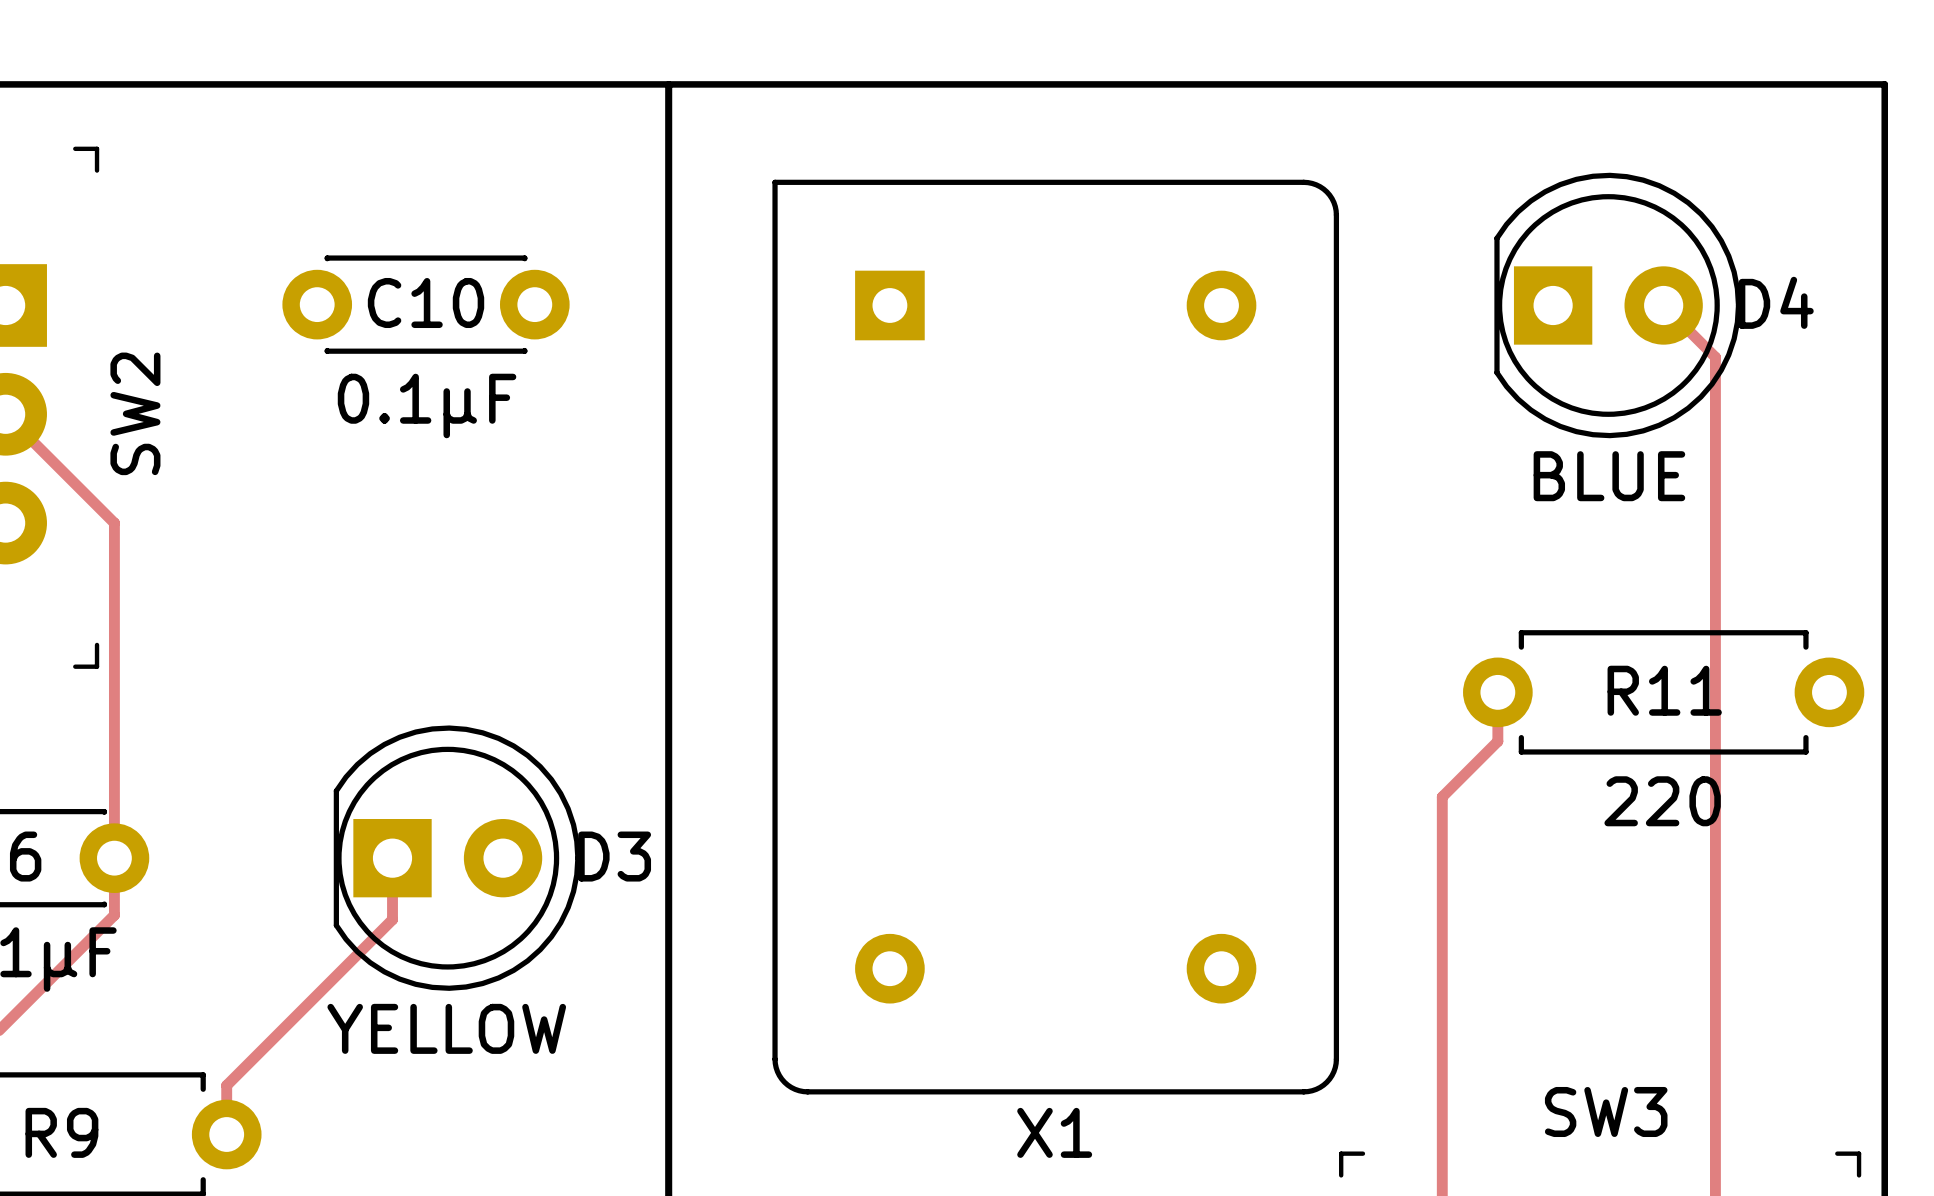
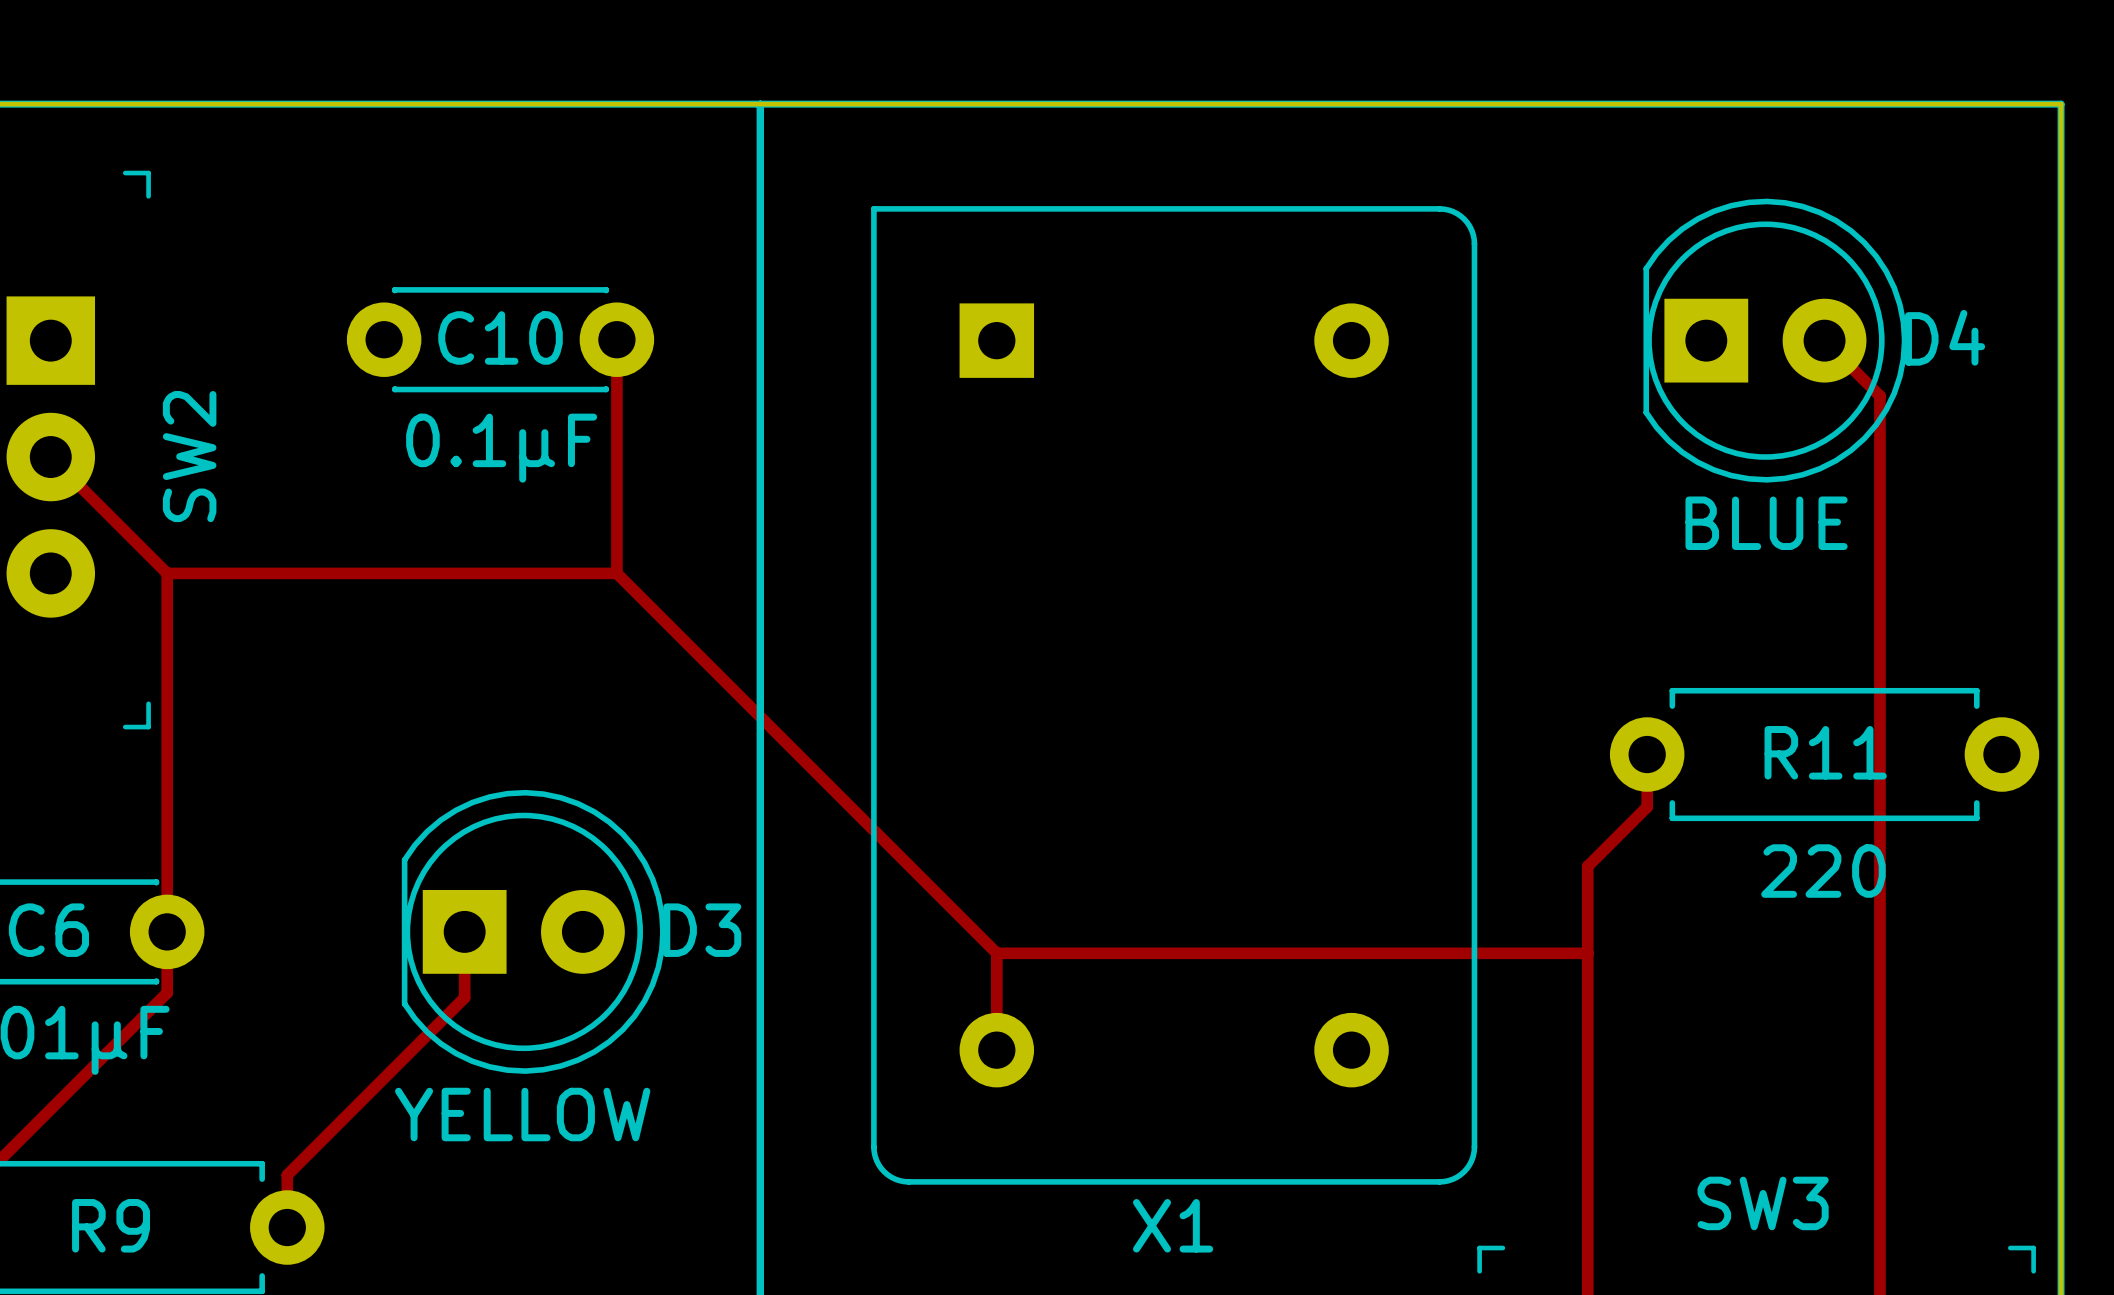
track: none -> (616, 339) (616, 573)
track: none -> (167, 573) (616, 573)
track: none -> (616, 573) (996, 953)
track: none -> (996, 953) (1587, 953)
track: none -> (996, 953) (996, 1050)

